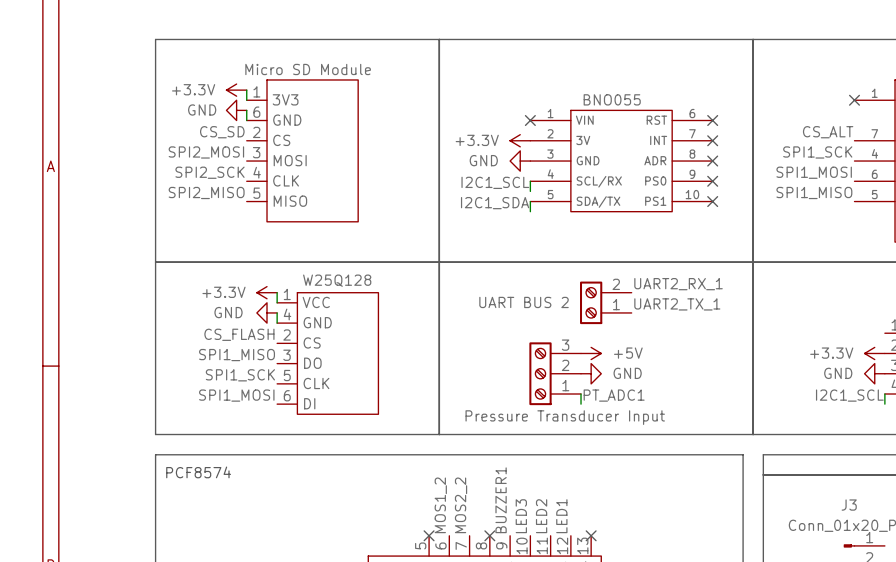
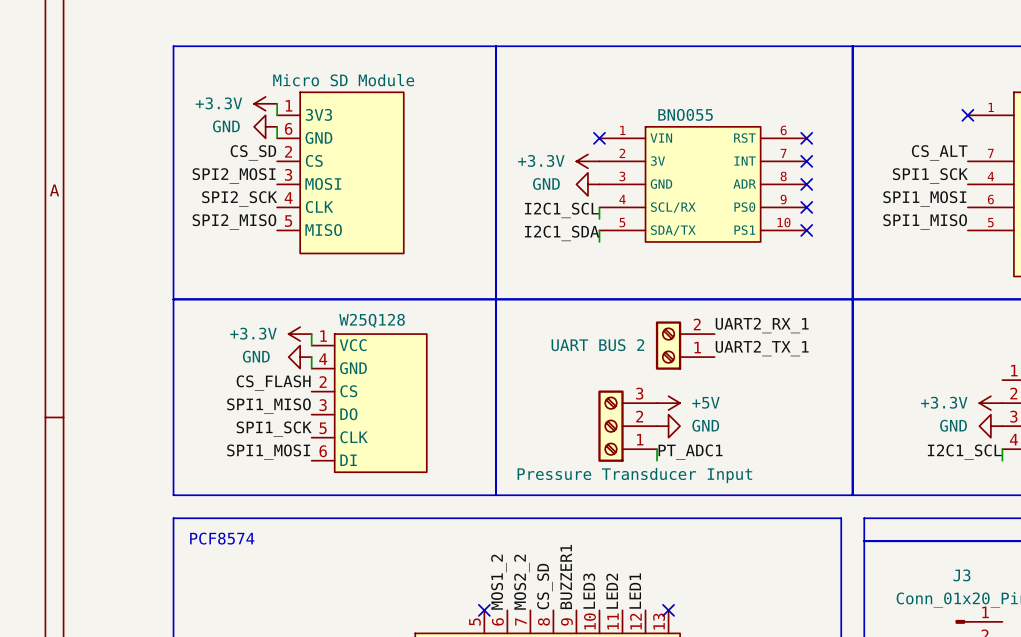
label: none -> CS_SD (544, 586)
no-connect mark: (489, 535) -> none

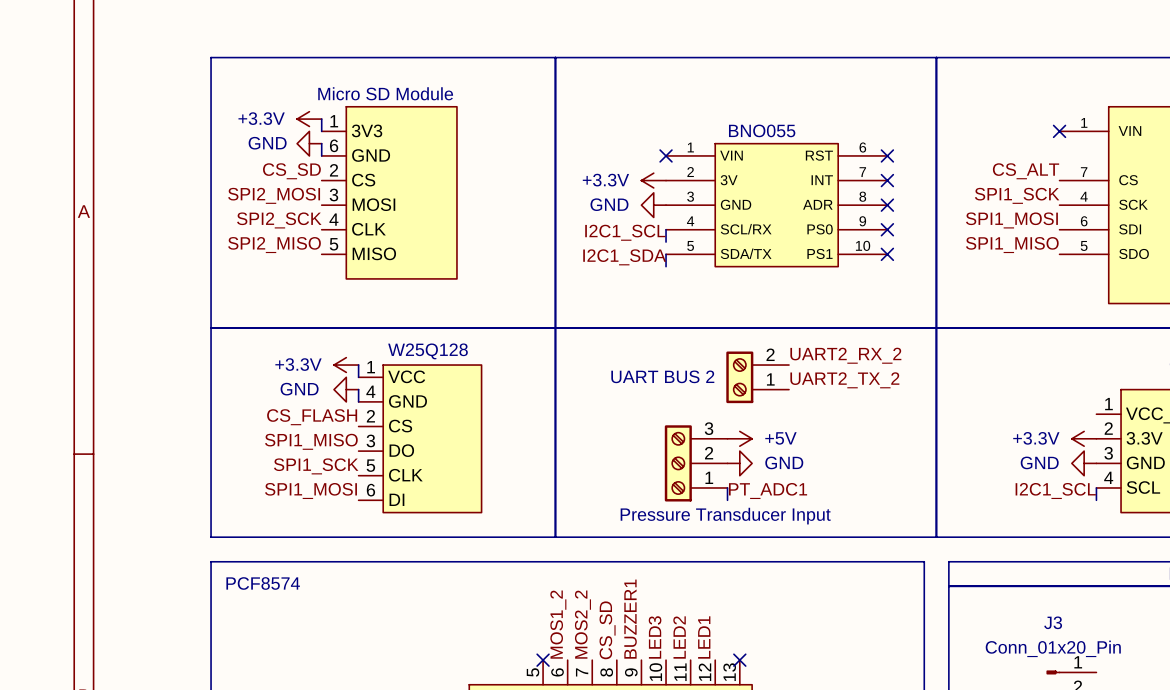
label: UART2_RX_1 (762, 325) -> UART2_RX_2 (845, 355)
label: UART2_TX_1 (762, 348) -> UART2_TX_2 (844, 380)

